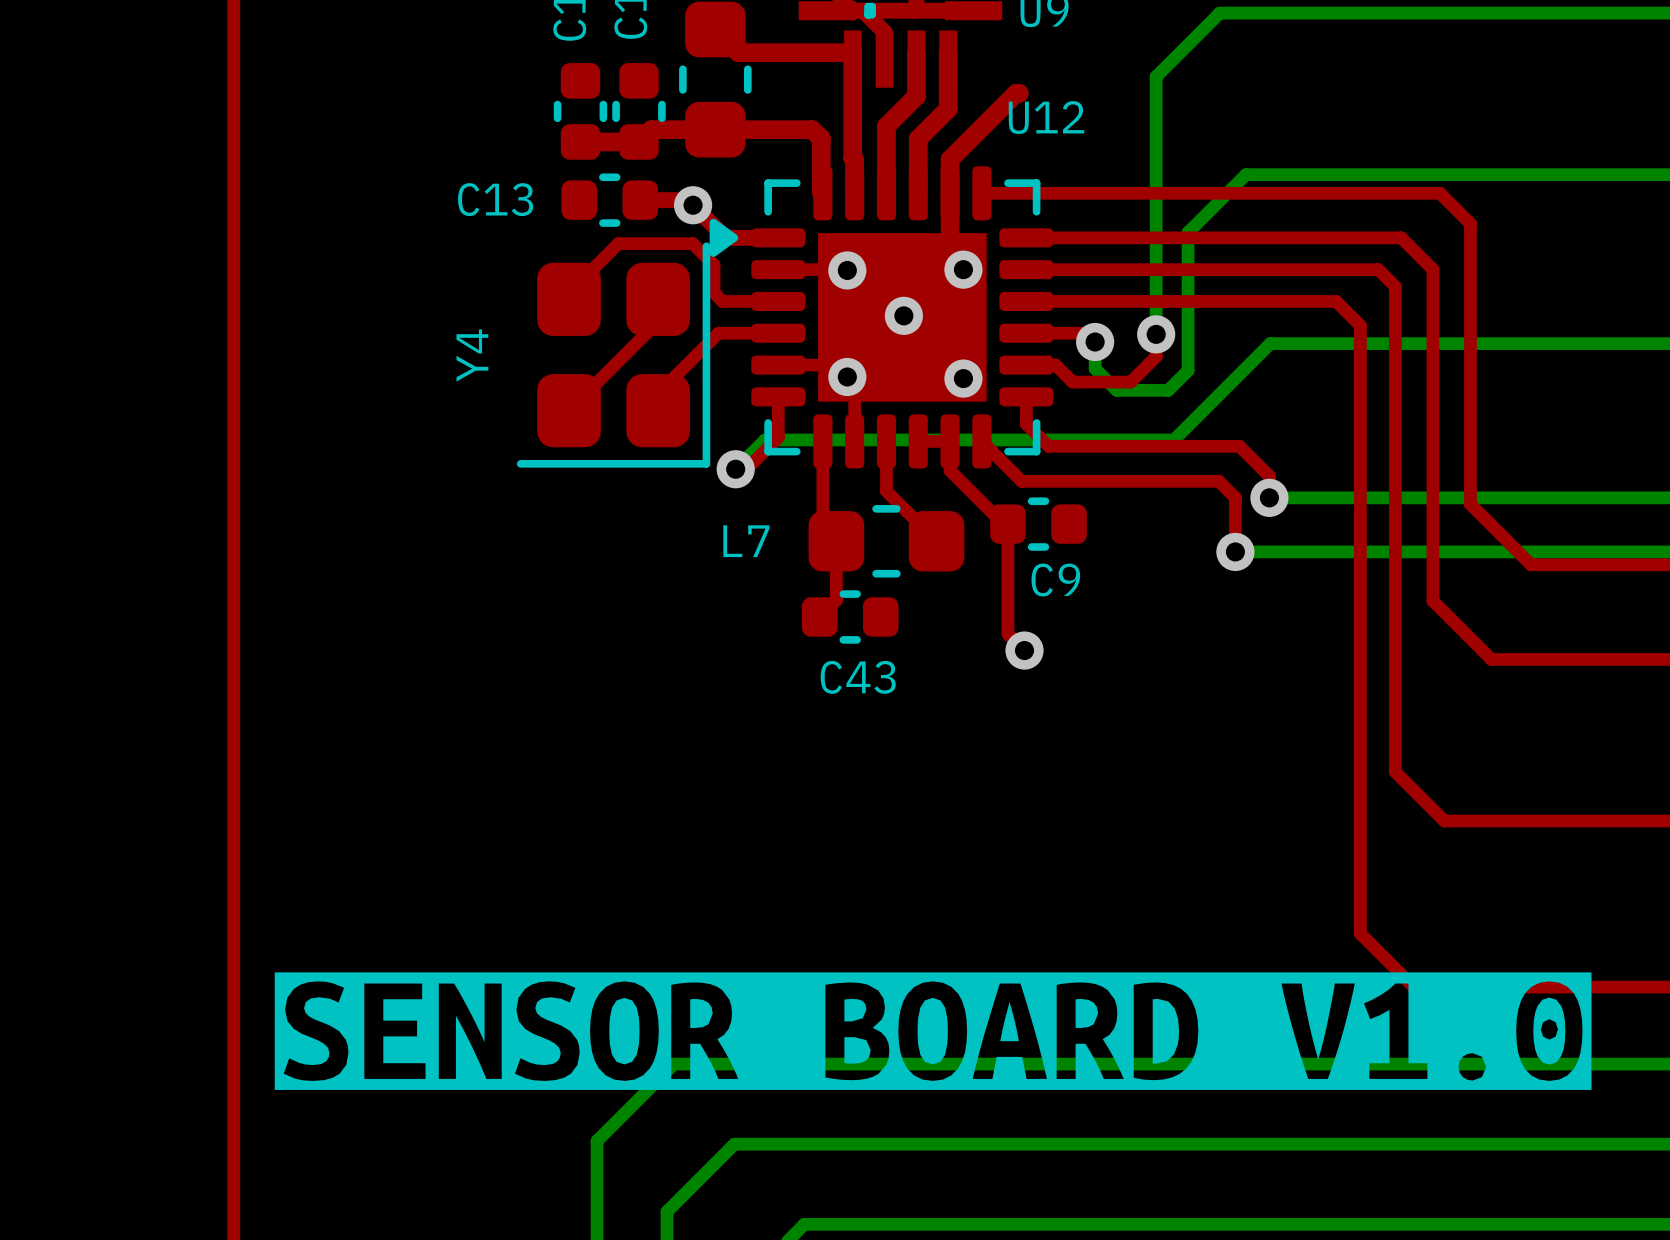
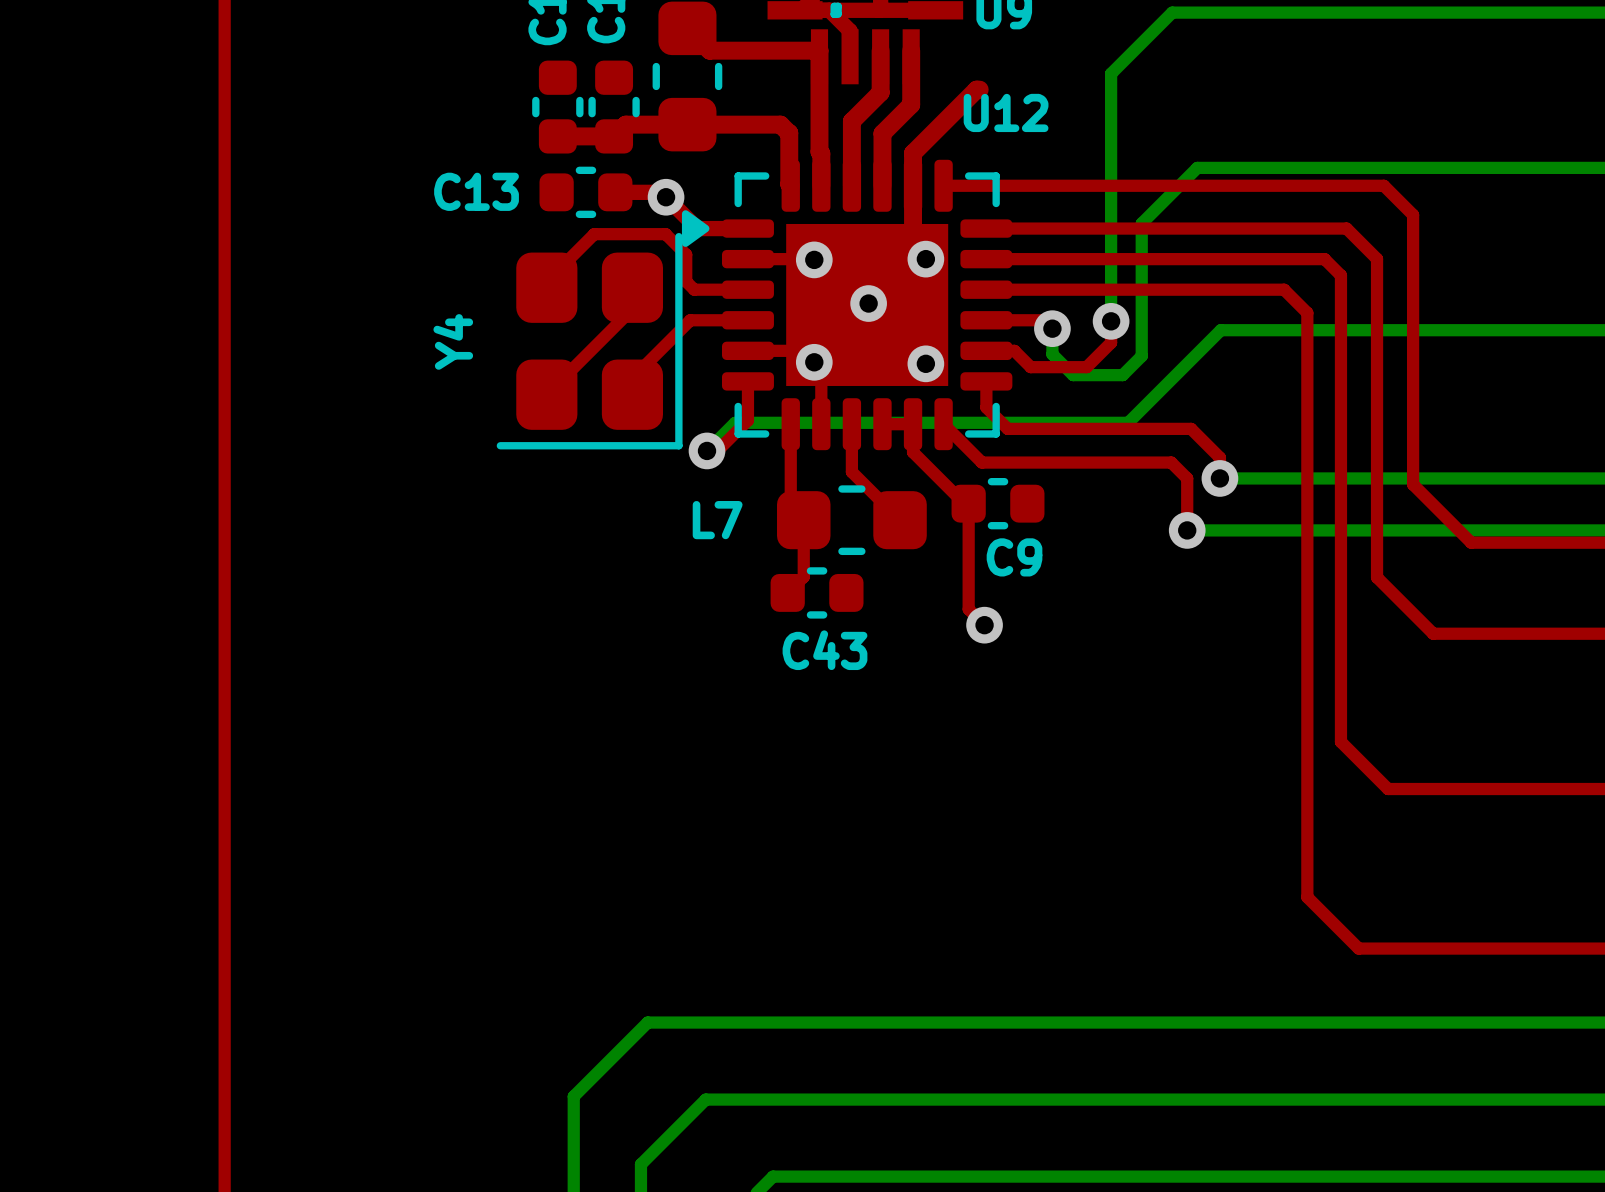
drawing: [274, 972, 1592, 1090] -> none

